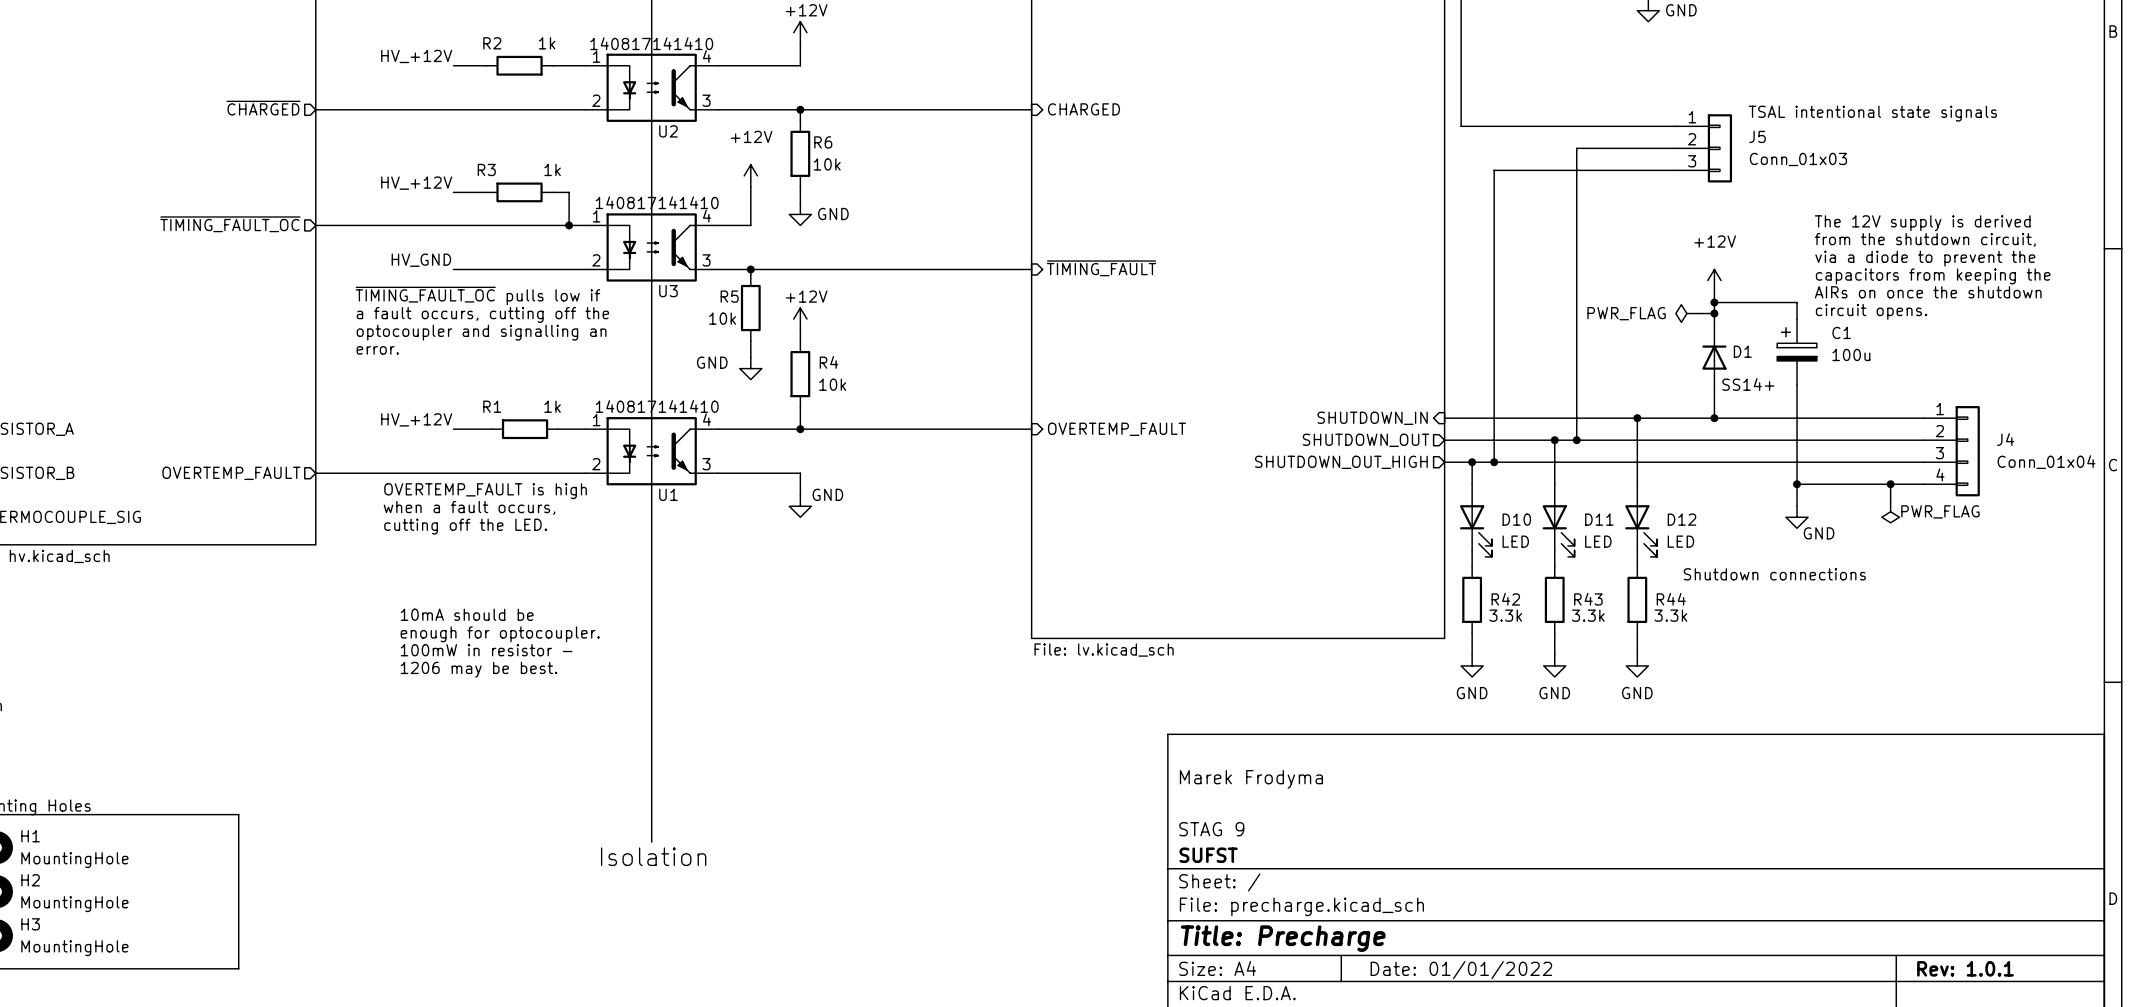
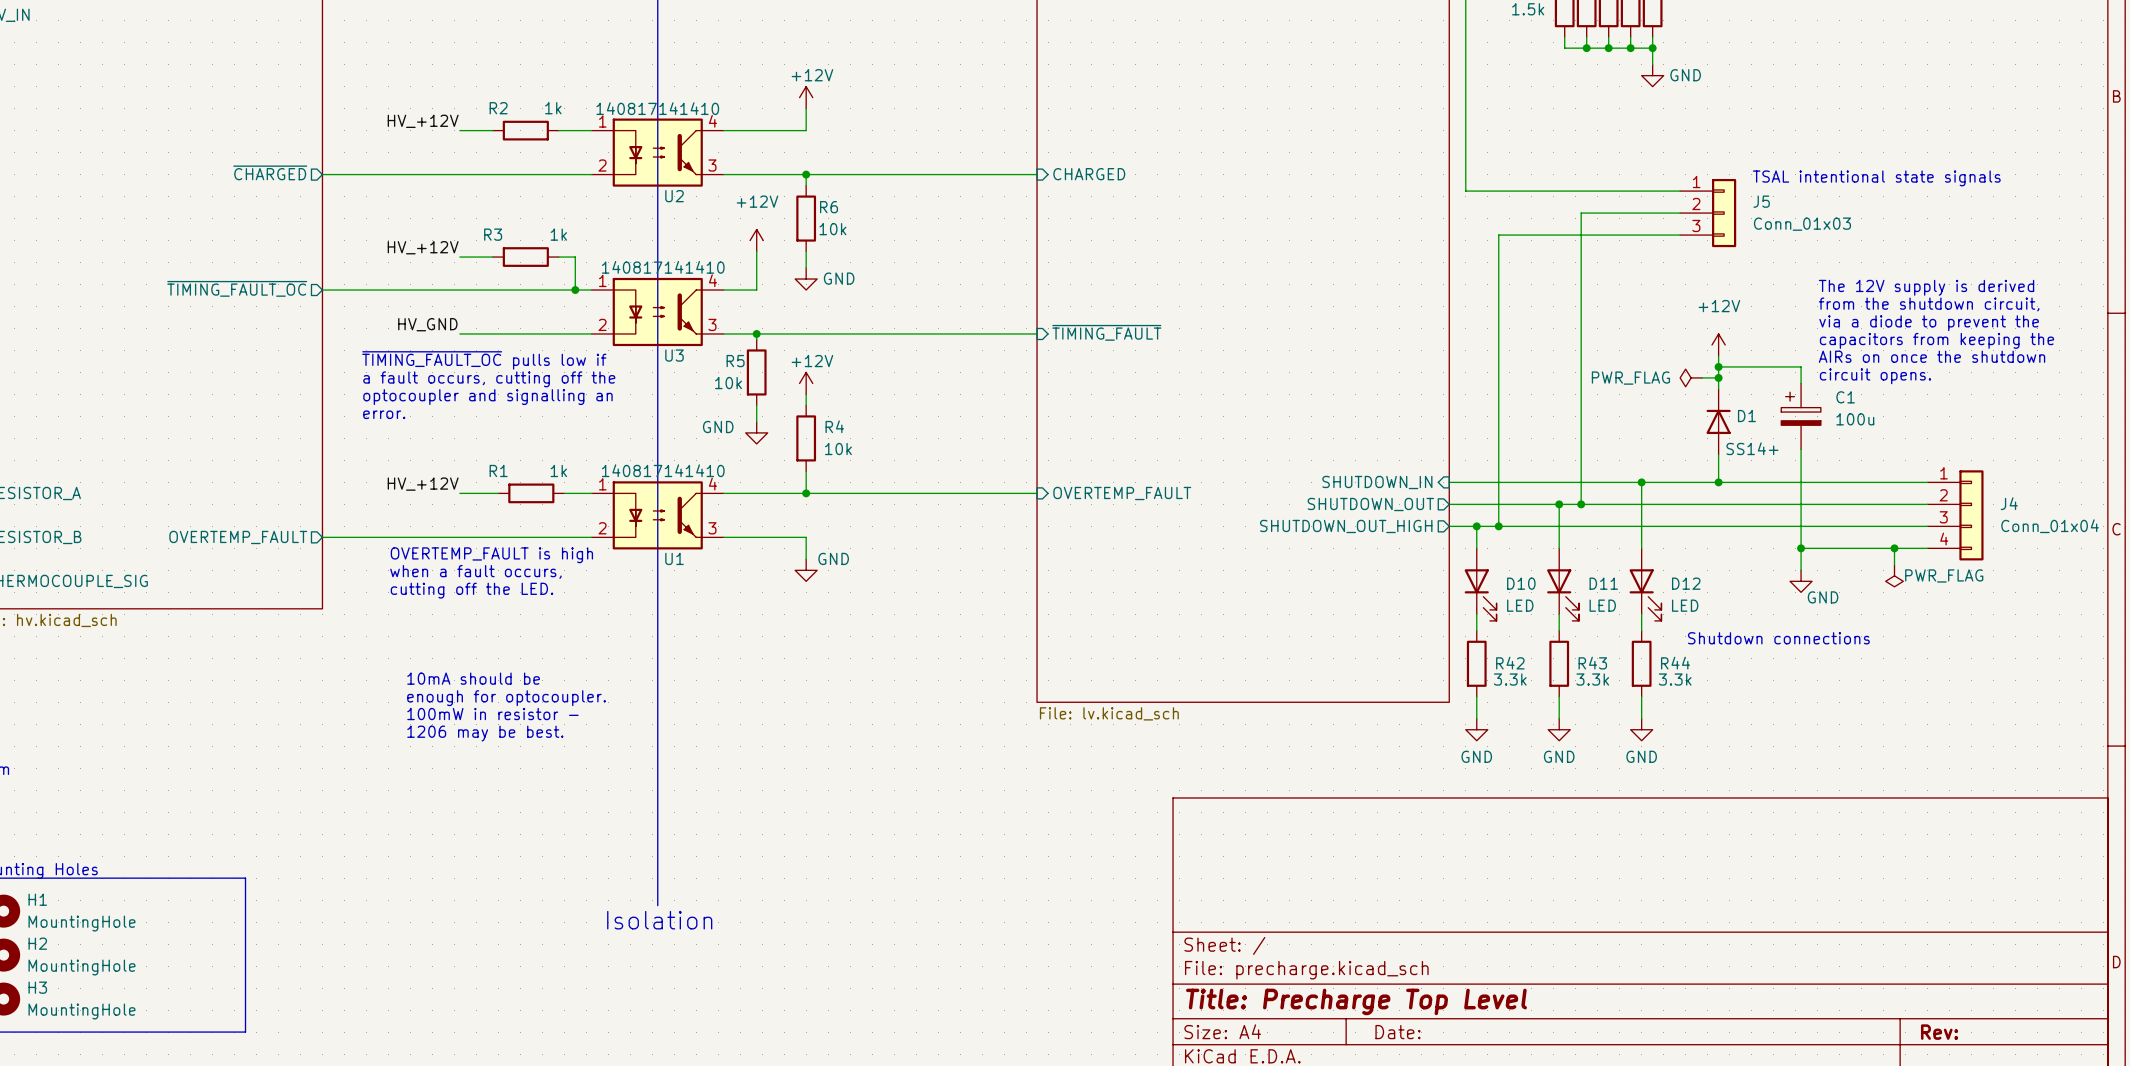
title block: Marek Frodyma (1251, 779) -> none
title block: STAG 9 (1211, 829) -> none
title block: SUFST (1208, 855) -> none
title block: Title: Precharge (1283, 938) -> Title: Precharge Top Level (1356, 1001)
title block: Rev: 1.0.1 (1965, 968) -> Rev: (1939, 1032)
title block: Date: 01/01/2022 (1461, 970) -> Date: (1398, 1032)

